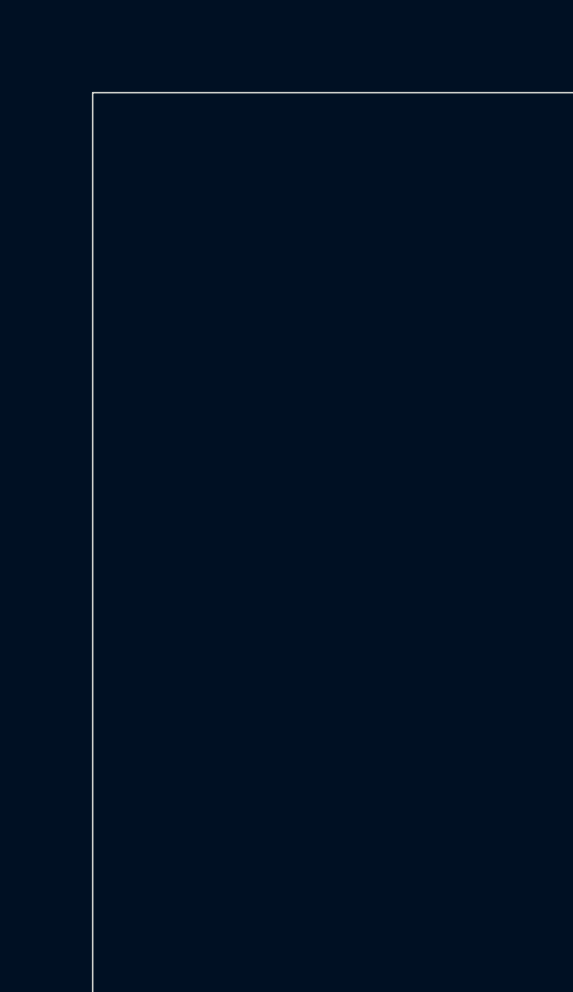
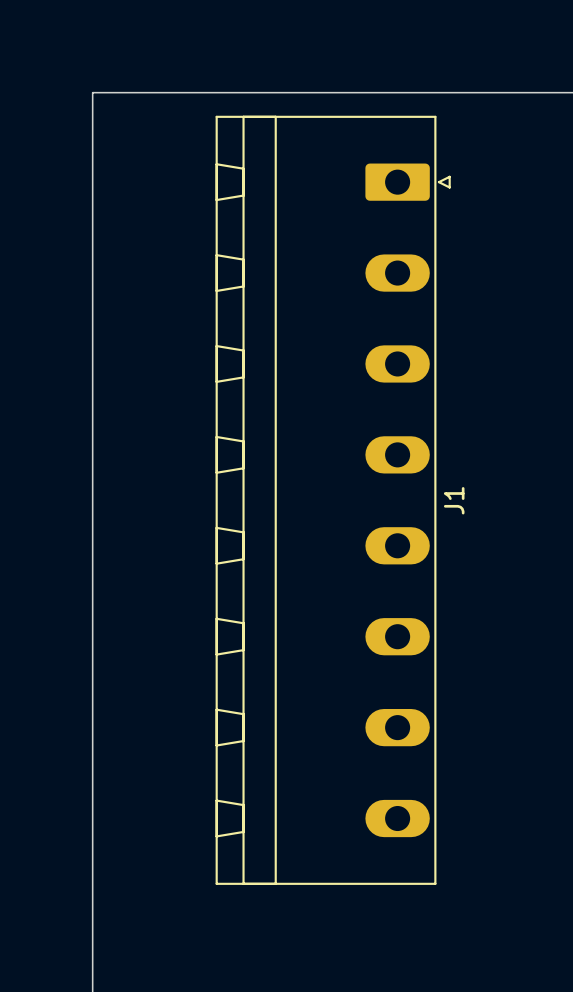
J1: none -> (333, 500)

